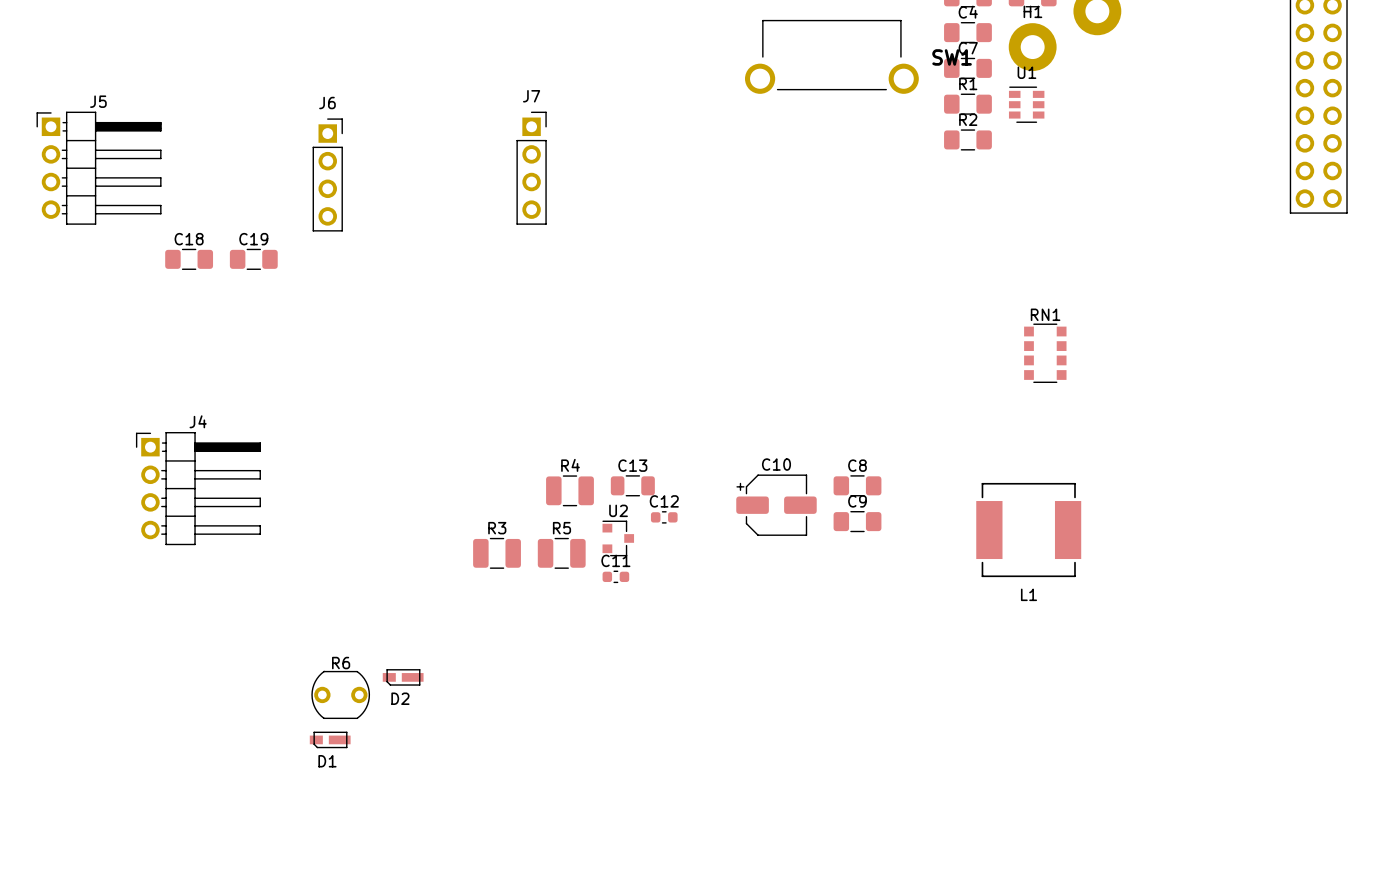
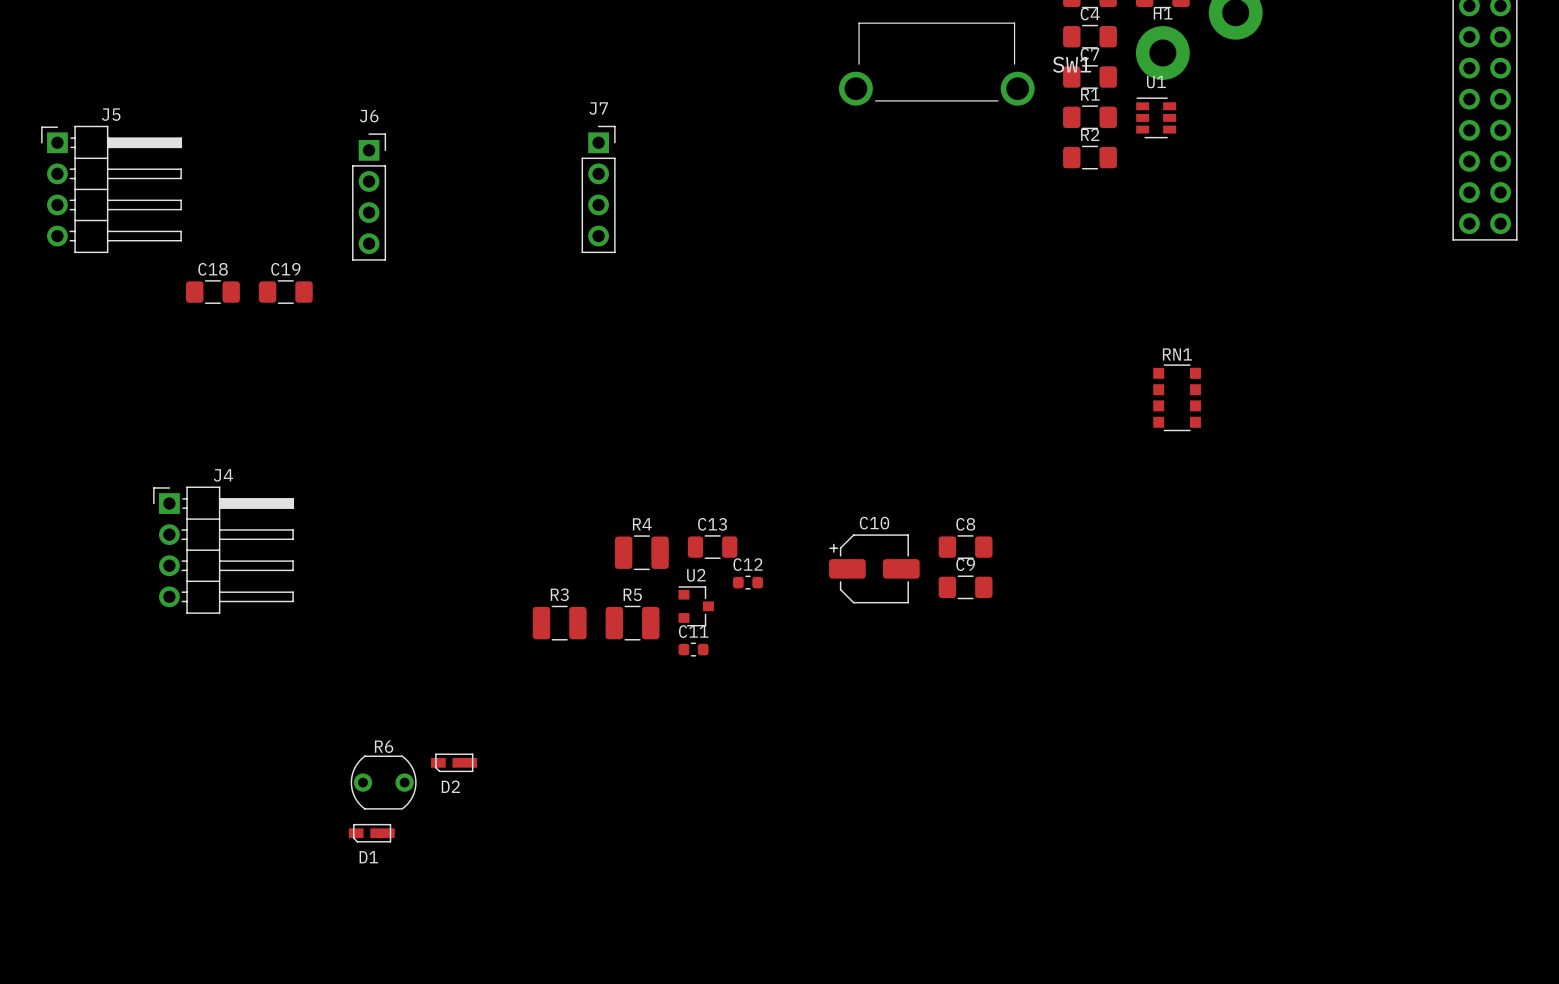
L1: (1028, 530) -> none

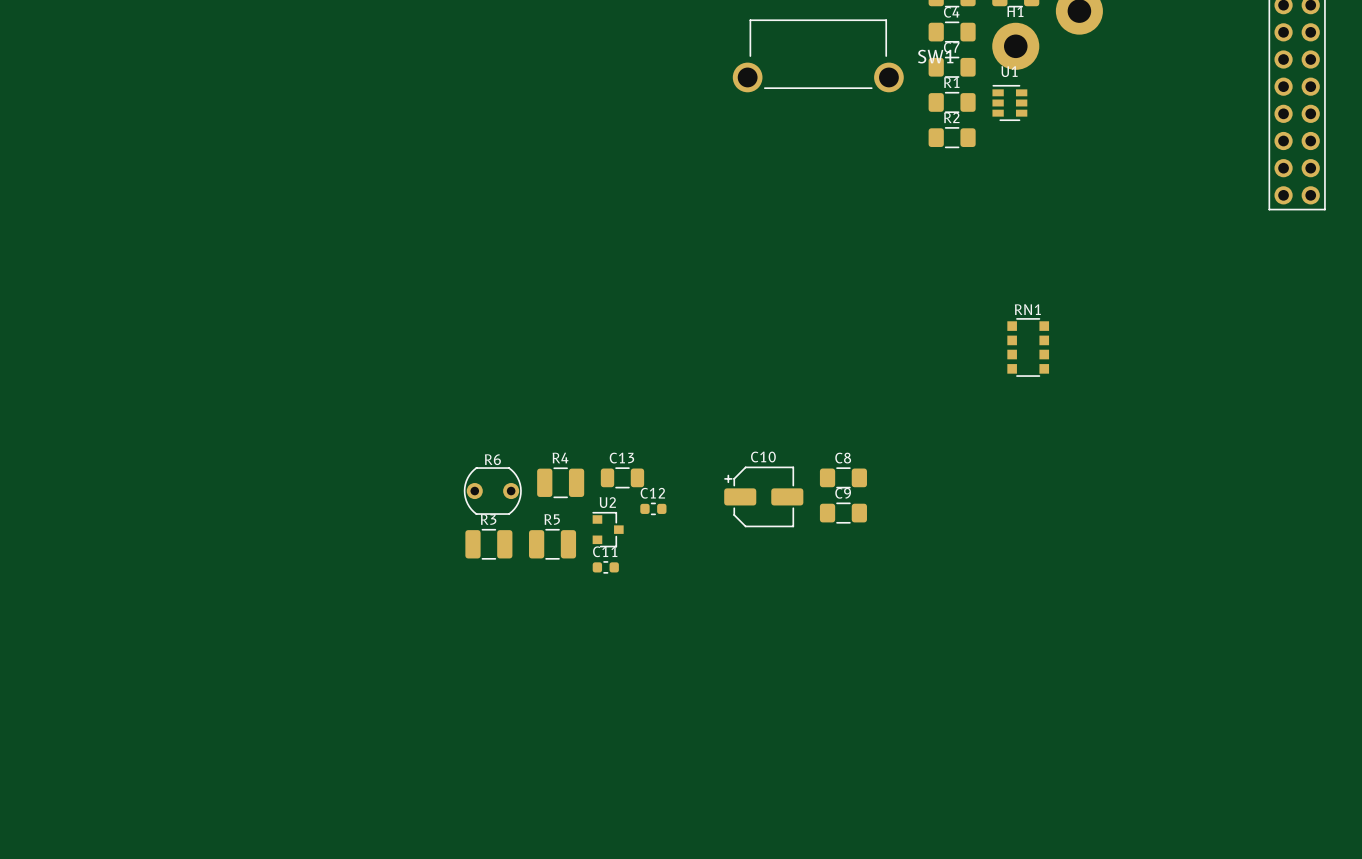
J5: (111, 189) -> none
J7: (598, 189) -> none
J6: (369, 197) -> none
C18: (212, 292) -> none
C19: (285, 292) -> none
J4: (223, 550) -> none
D2: (453, 762) -> none
R6 position: (383, 782) -> (492, 490)
D1: (371, 833) -> none

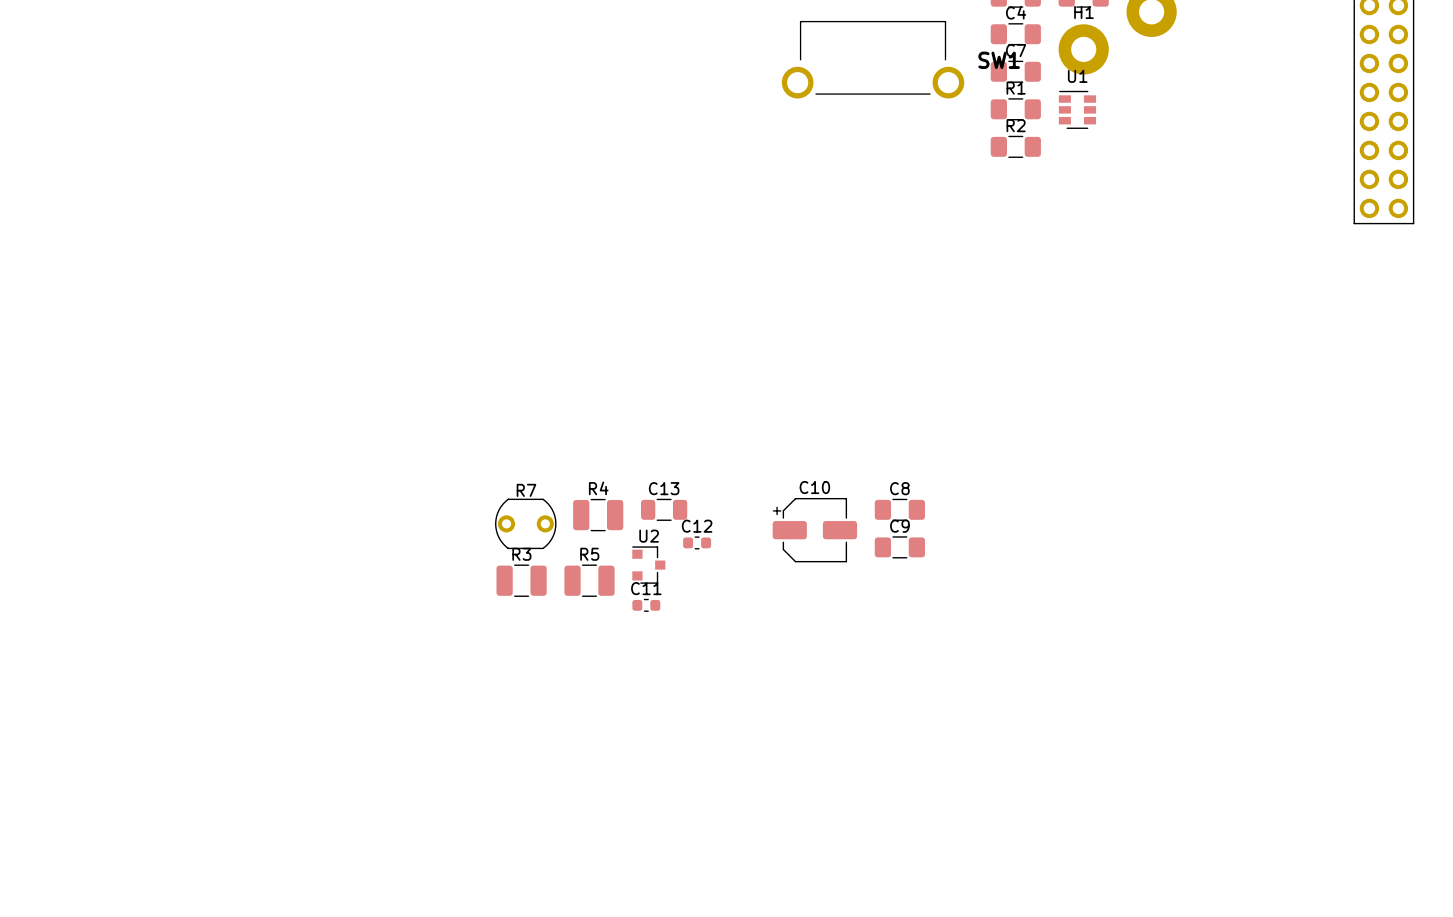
RN1: (1028, 347) -> none
R6 name: R6 (492, 459) -> R7 (526, 490)

